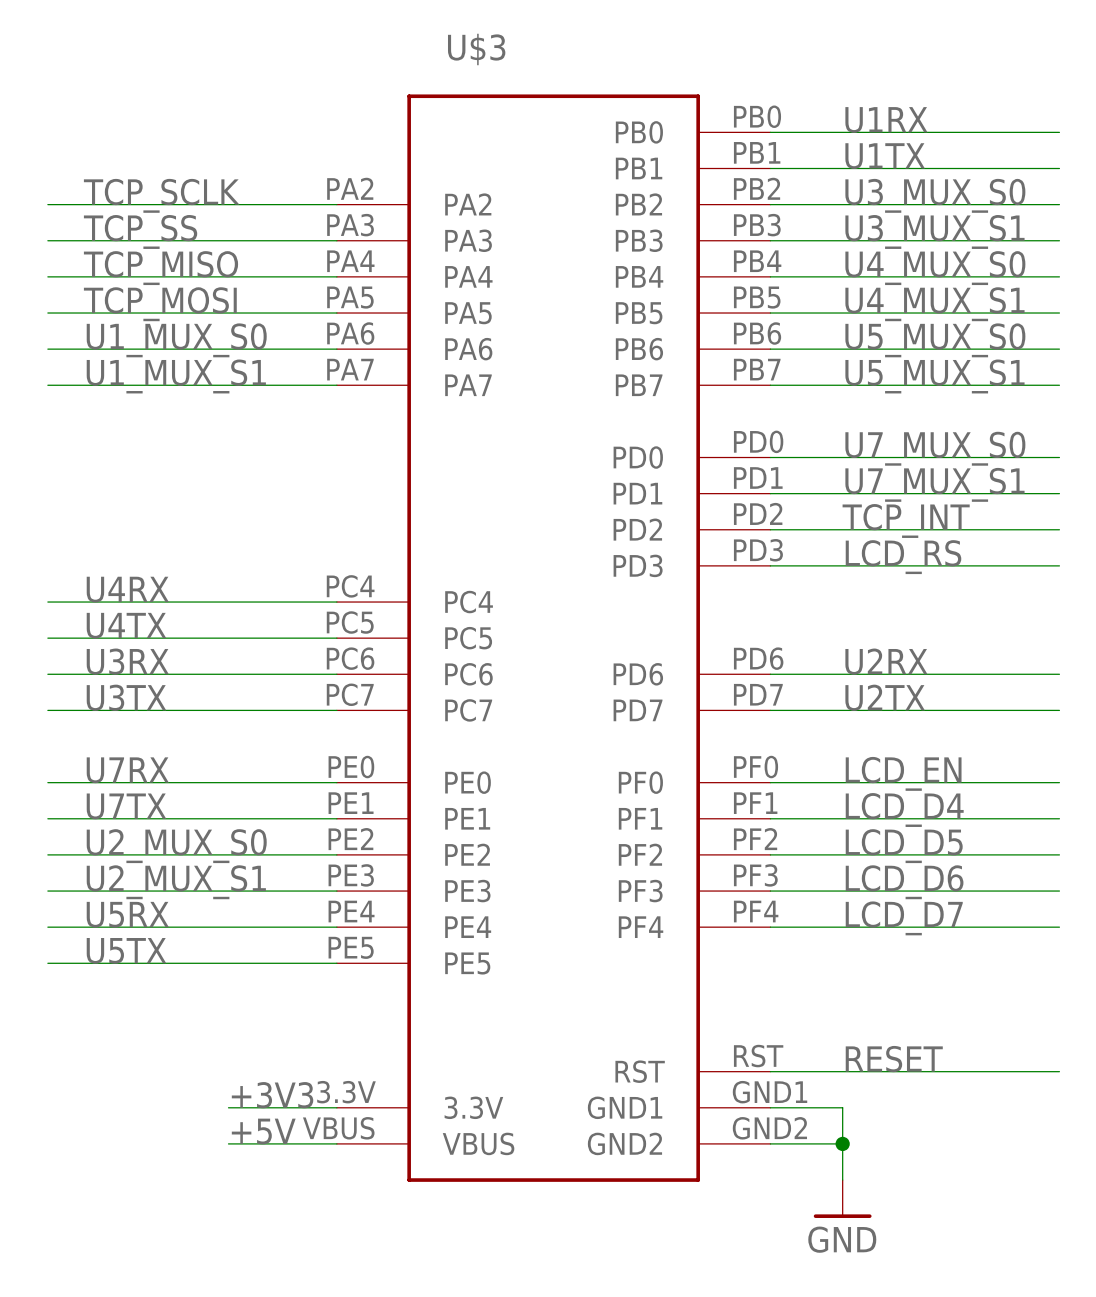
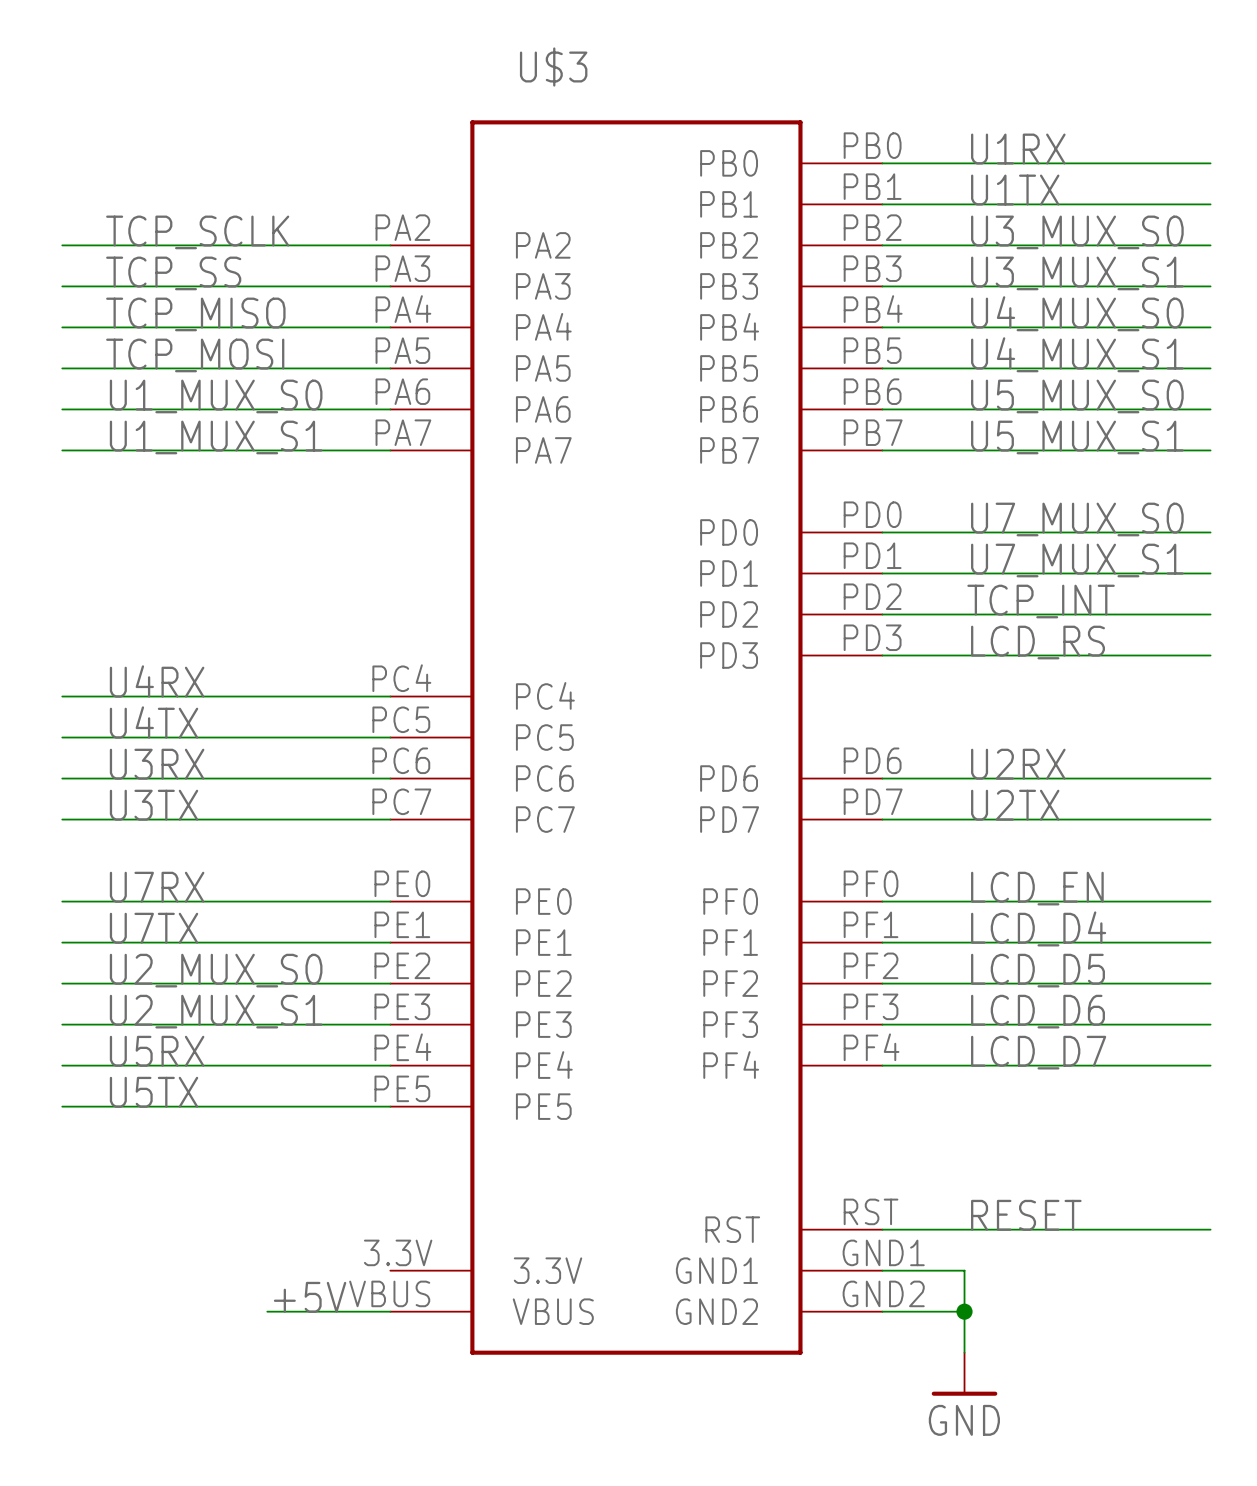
label: +3V3 (272, 1095) -> none
wire: (228, 1107) (336, 1107) -> none

